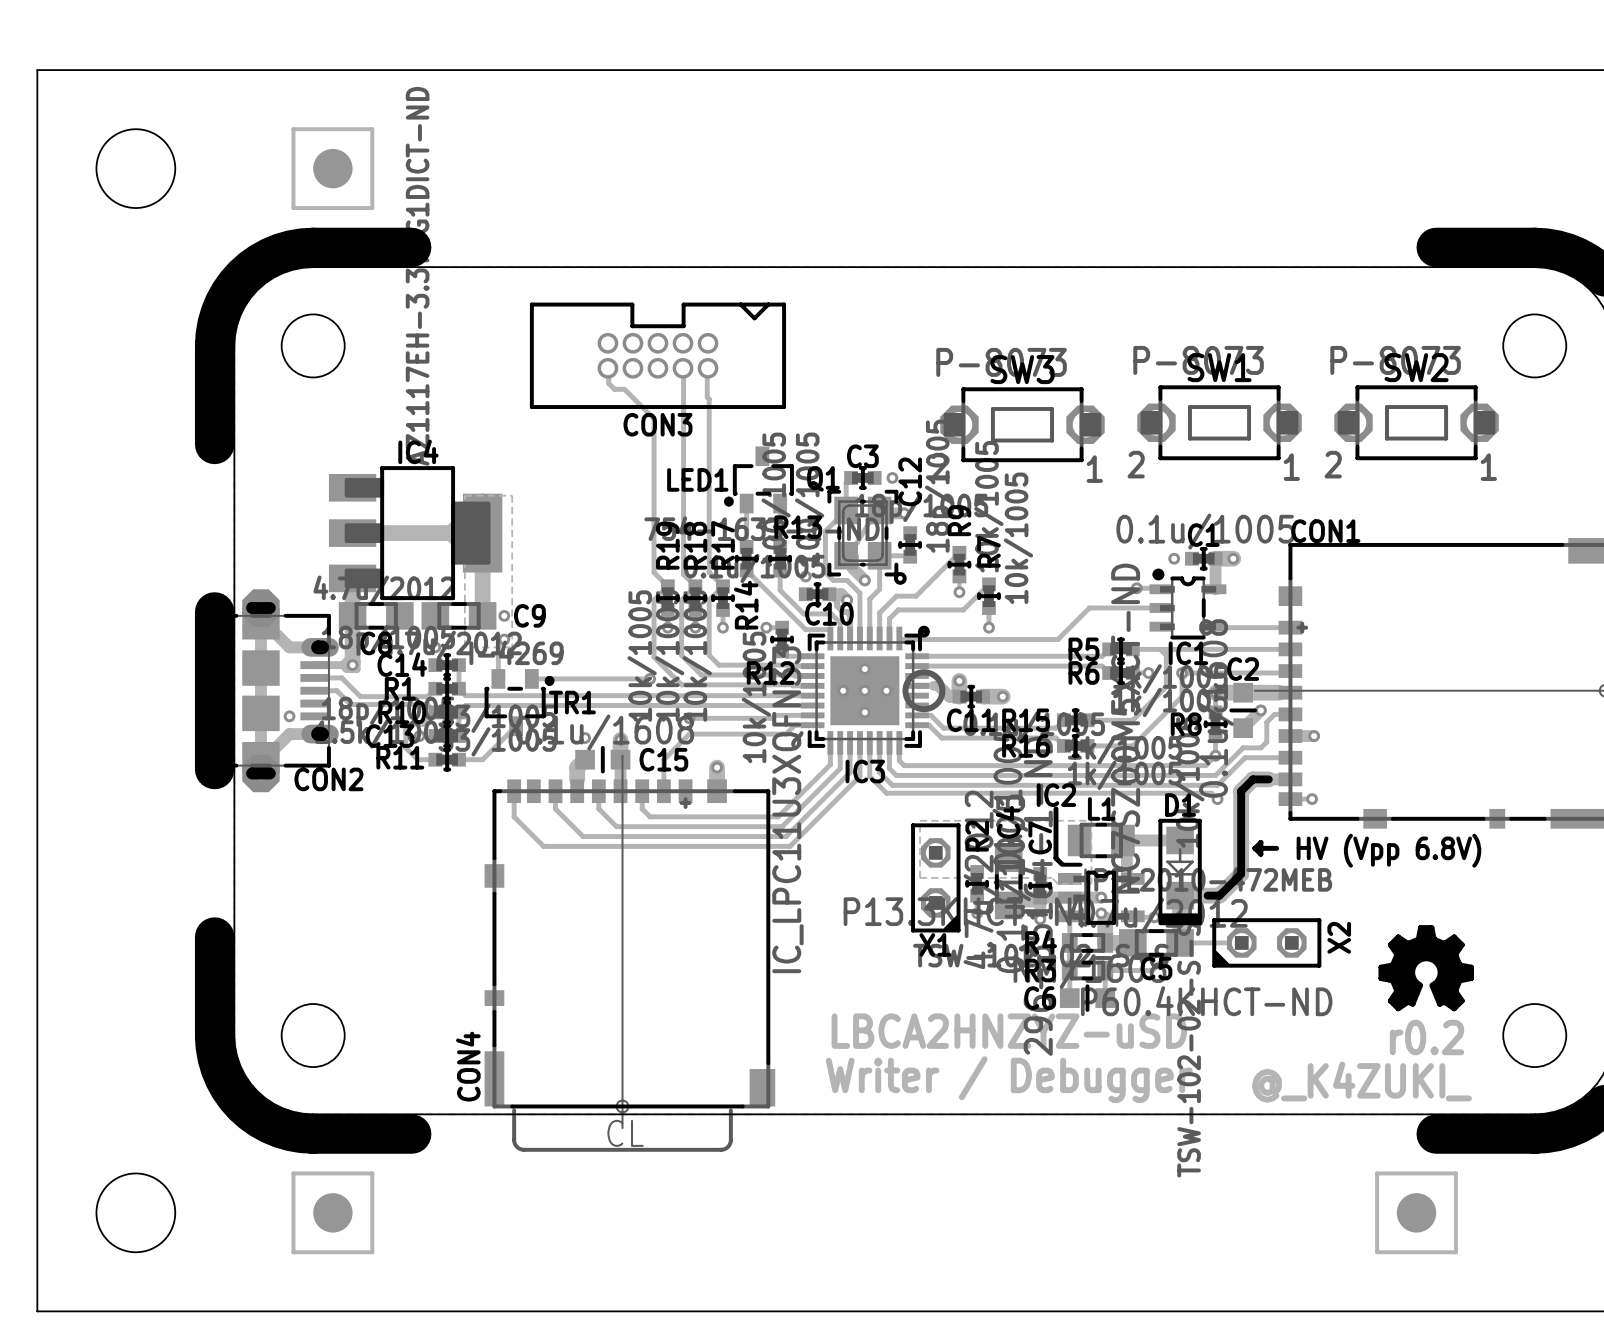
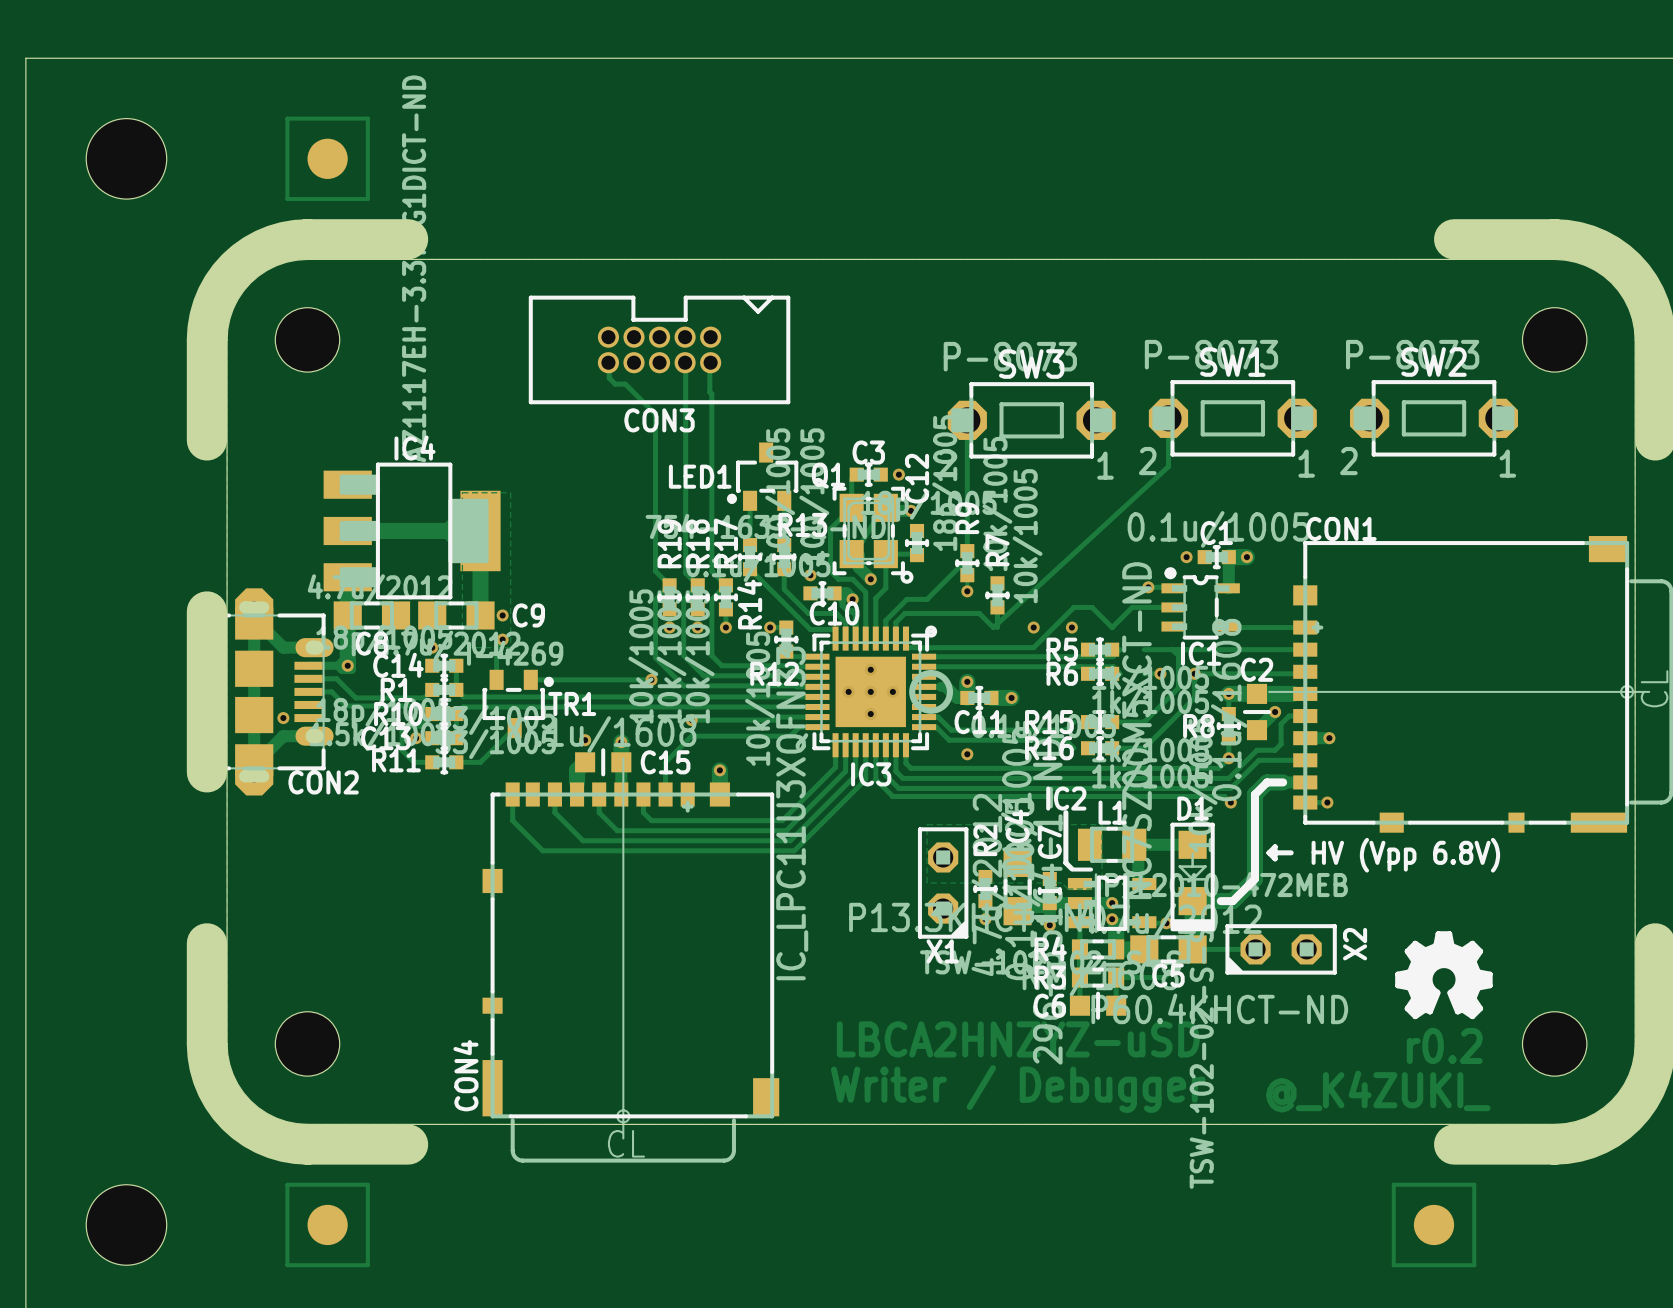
track: (959, 552) (916, 596) (896, 596) (879, 612) (879, 620) -> (967, 420) (967, 559) (927, 599) (906, 599) (885, 620)
track: (988, 584) (963, 609) (898, 609) (889, 618) (889, 622) -> (1168, 418) (1168, 466) (993, 627) (979, 613) (904, 613) (895, 622)
track: (1120, 607) (1089, 607) (1057, 639) (899, 638) -> (1132, 607) (1112, 627) (1092, 607) (1073, 607) (1033, 647) (906, 647)
via position: (988, 627) -> (1033, 627)
via: none -> (1071, 627)
R5 position: (1120, 649) -> (1100, 649)
R6 position: (1120, 673) -> (1100, 673)
R15 position: (1075, 720) -> (1100, 722)
R16 position: (1075, 745) -> (1100, 748)
via: none -> (967, 754)

